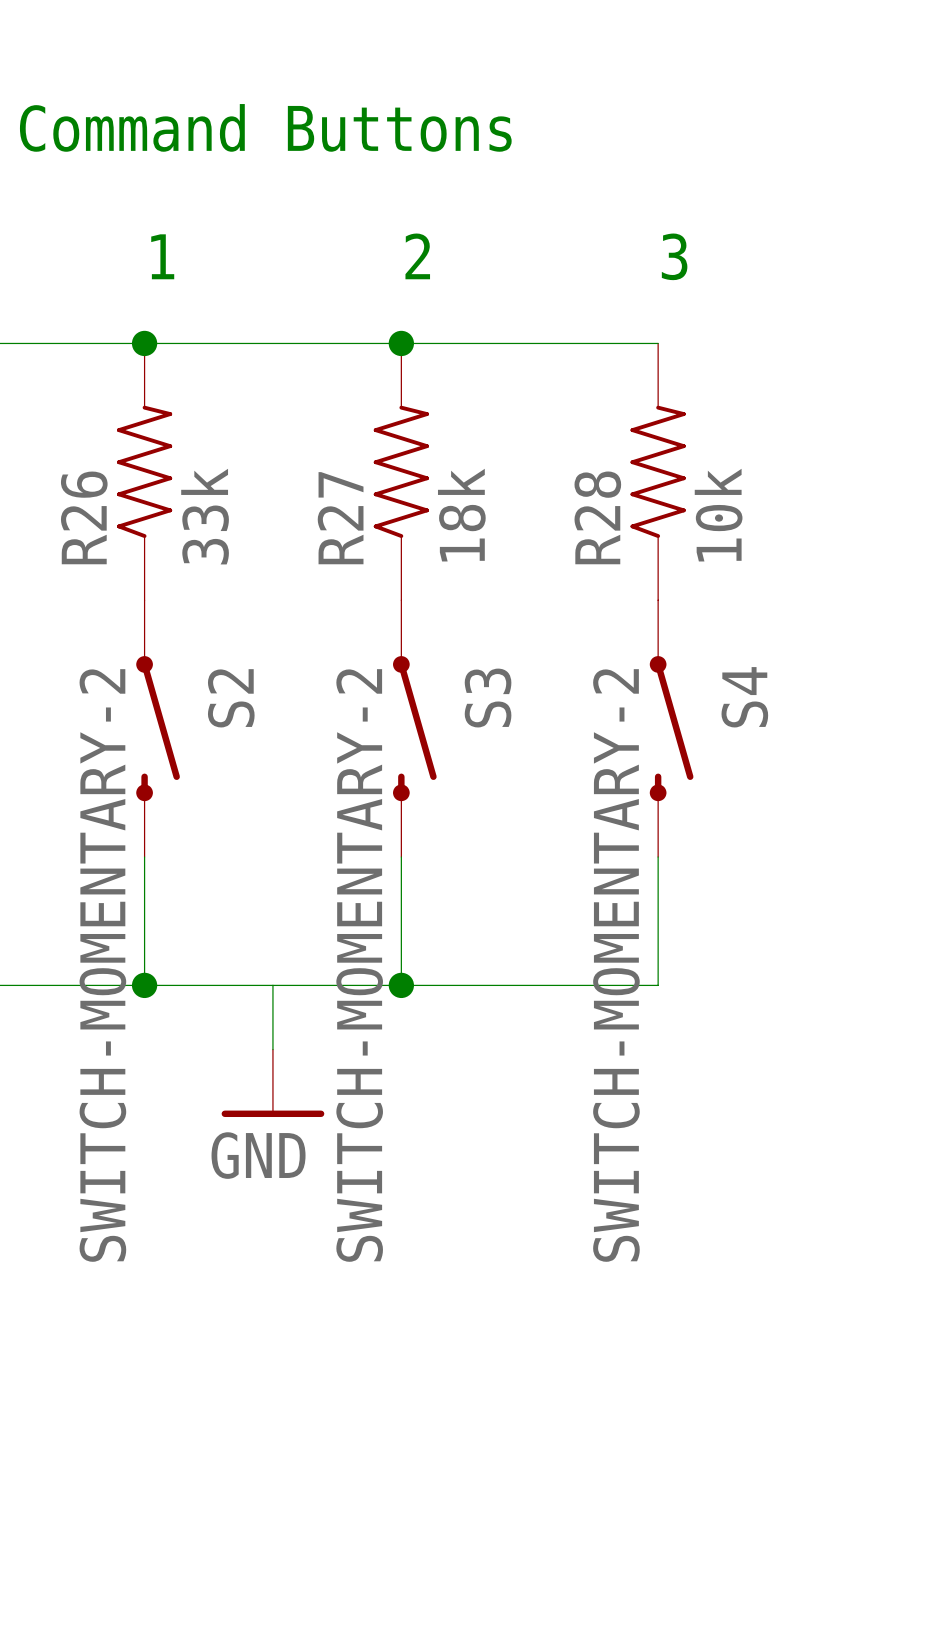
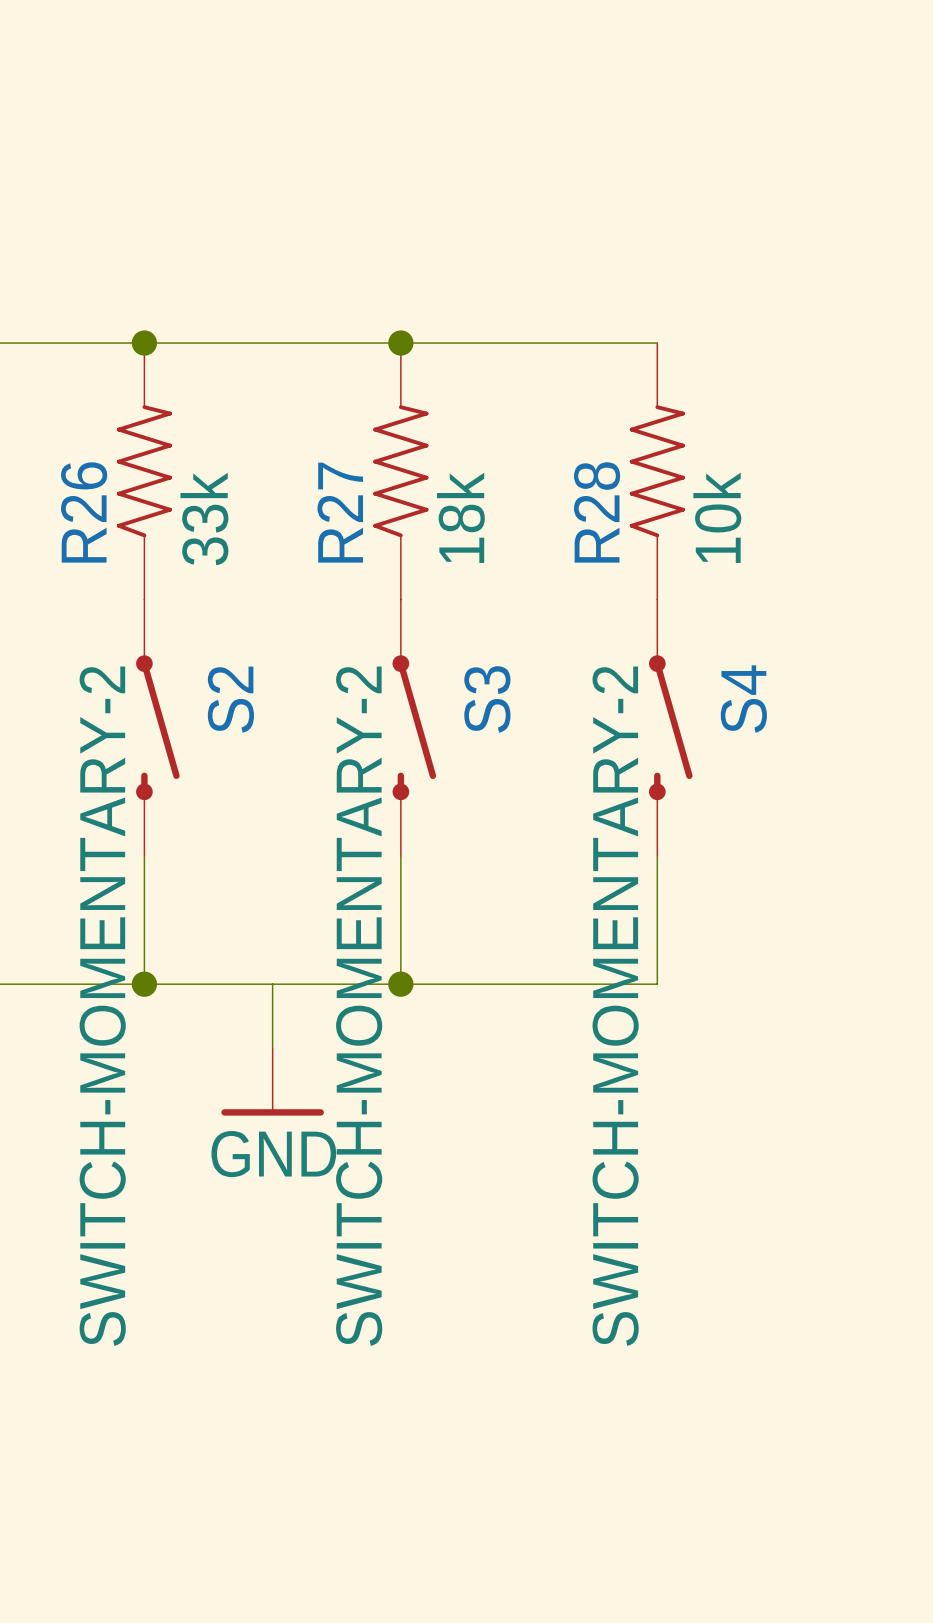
text: Command Buttons (265, 127) -> none
text: 1 (162, 256) -> none
text: 2 (417, 256) -> none
text: 3 (674, 256) -> none

